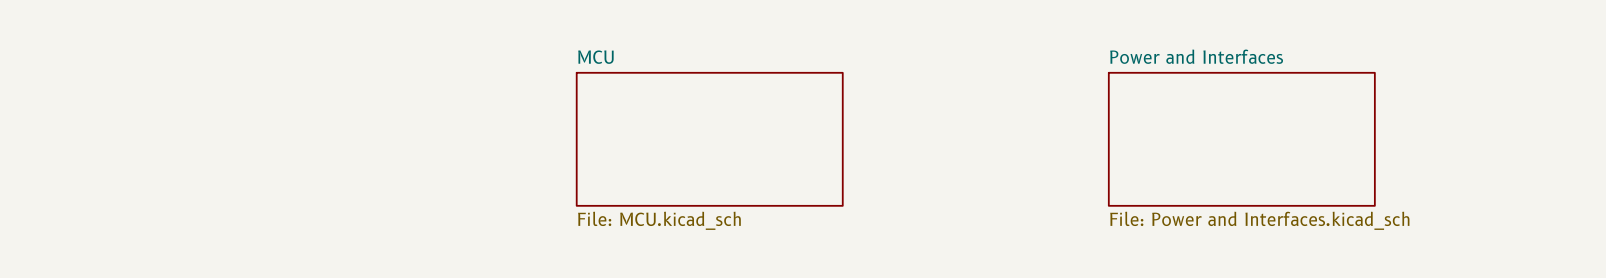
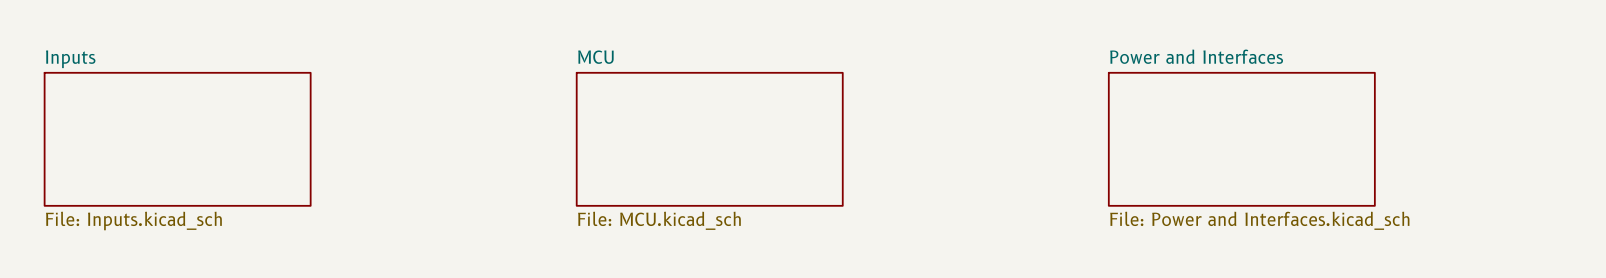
sheet Inputs: none -> File: Inputs.kicad_sch (177, 139)

